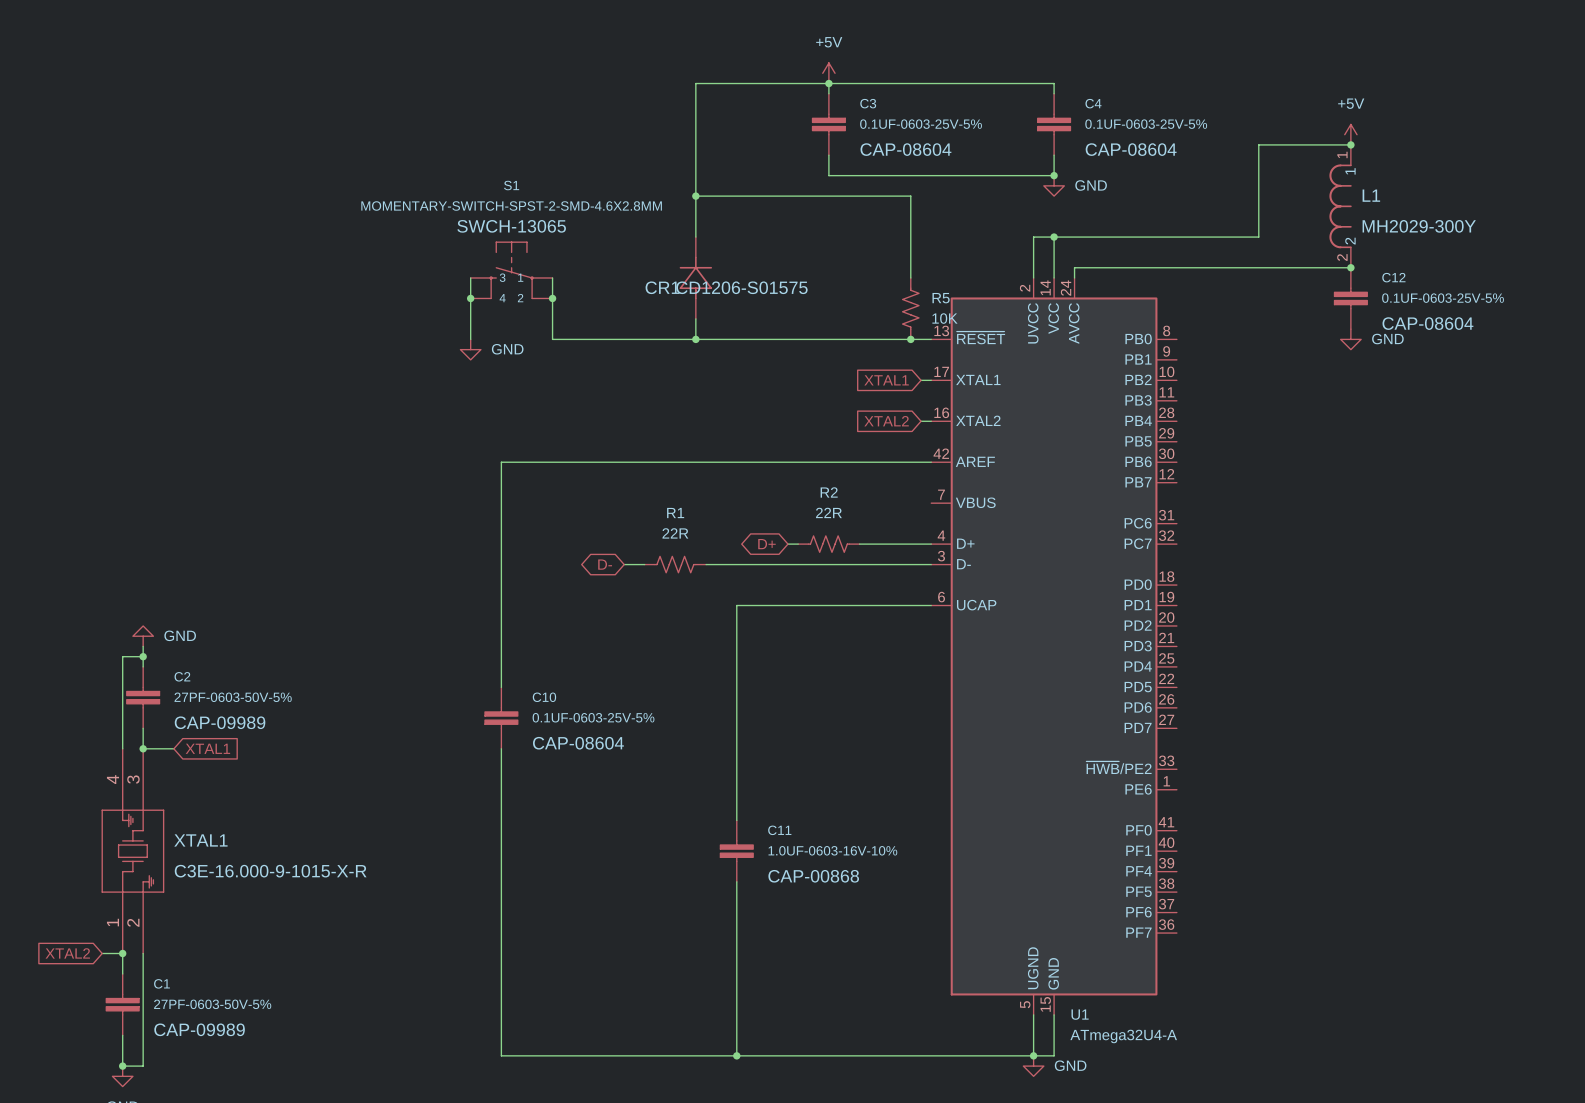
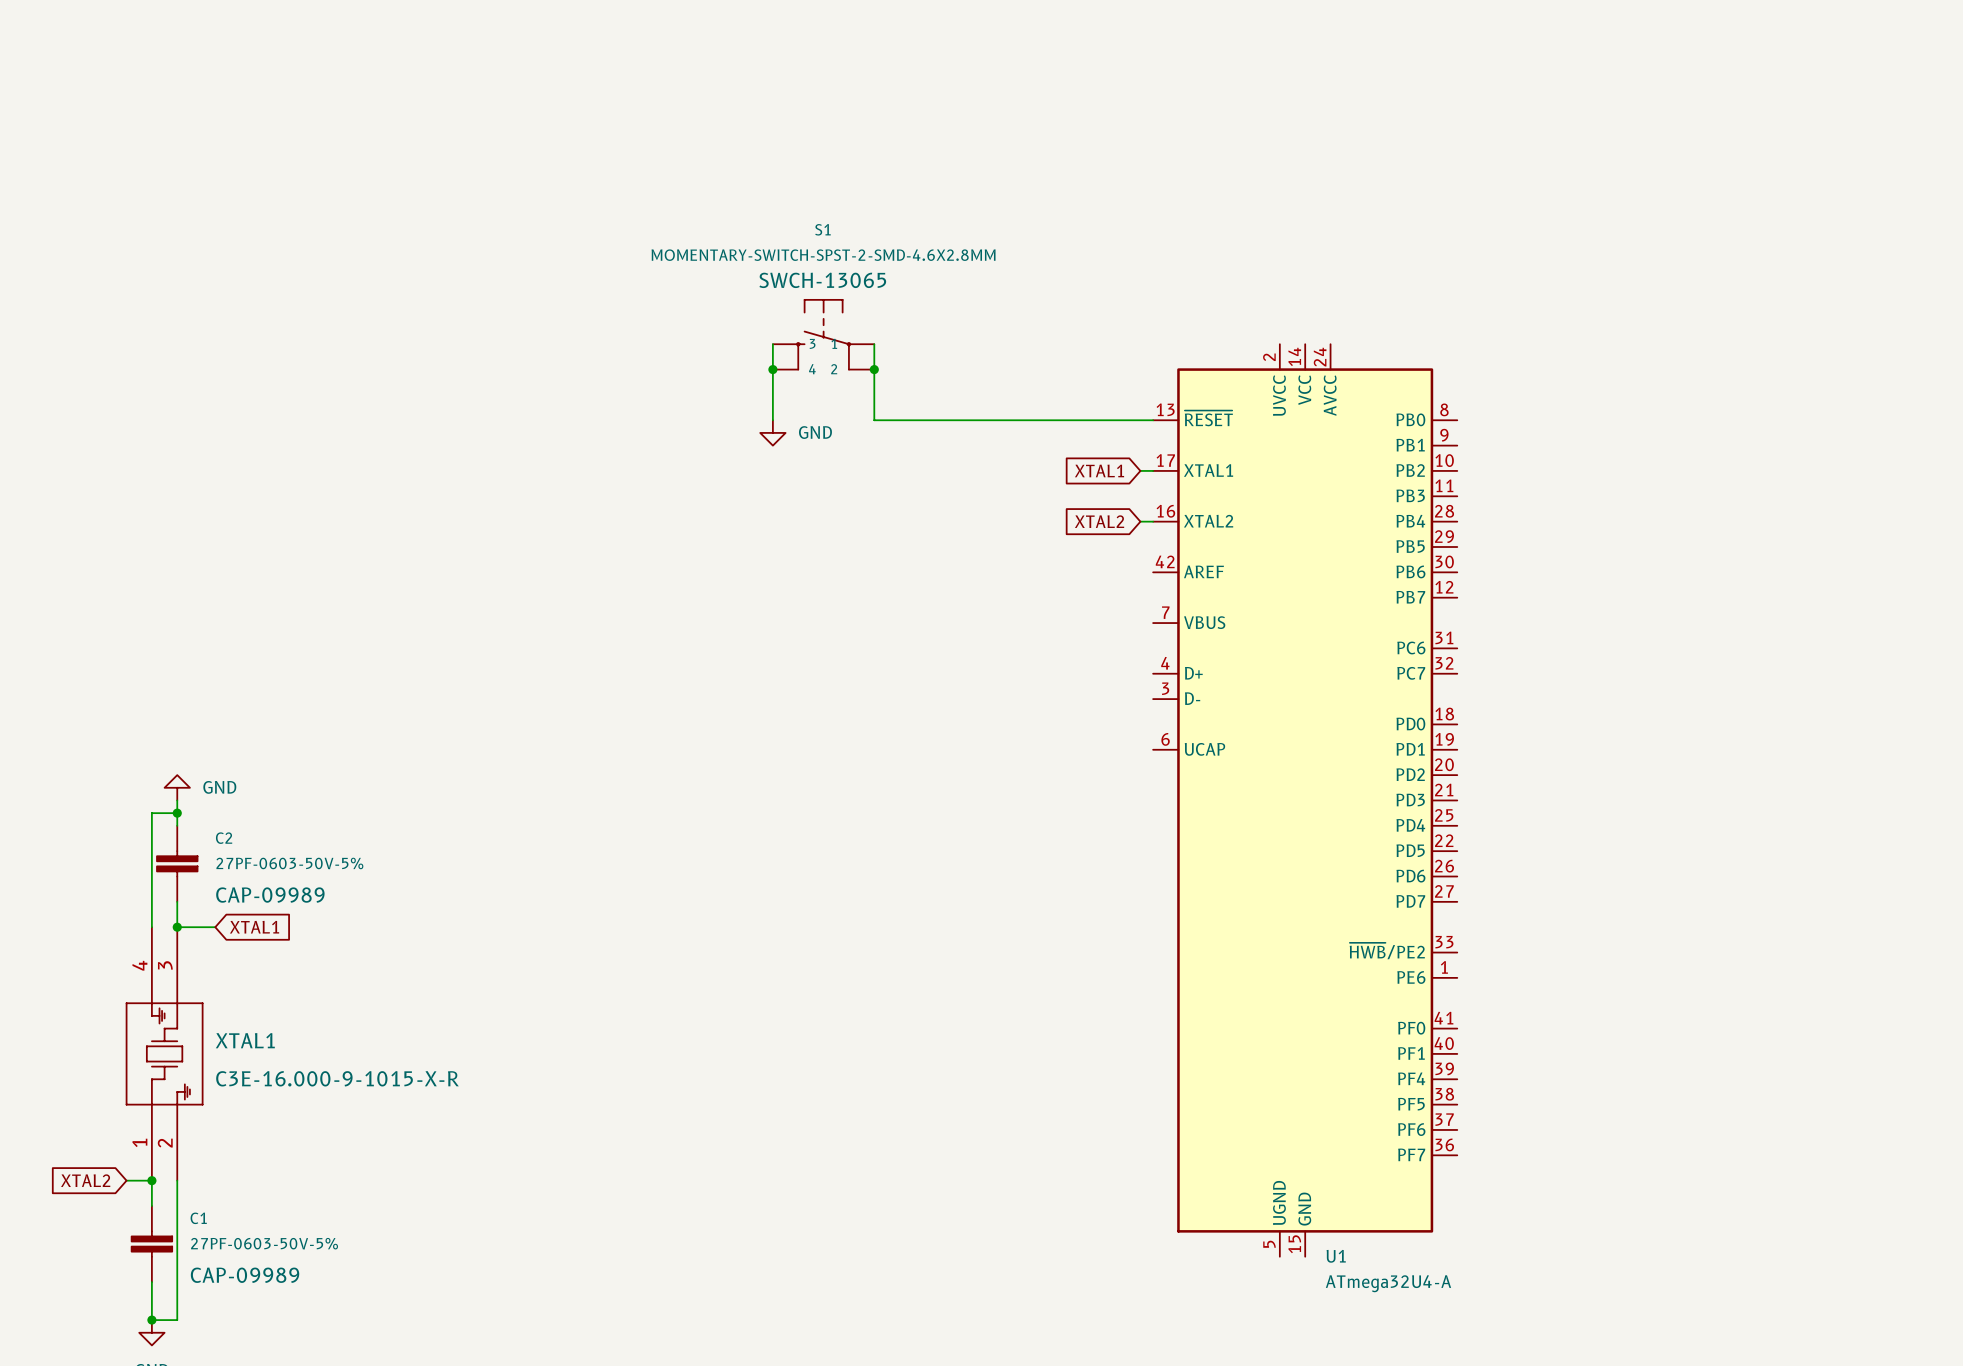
power symbol: +5V (828, 73) -> none
wire: (828, 83) (828, 93) -> none
junction: (828, 83) -> none
wire: (1054, 93) (1054, 83) (695, 83) (695, 237) -> none
C3: 0.1UF-0603-25V-5% (828, 124) -> none
C4: 0.1UF-0603-25V-5% (1054, 124) -> none
power symbol: +5V (1350, 134) -> none
wire: (1350, 144) (1258, 144) (1258, 237) (1033, 237) (1033, 277) -> none
junction: (1350, 144) -> none
wire: (828, 155) (828, 175) (1054, 175) (1054, 155) -> none
junction: (1054, 175) -> none
power symbol: GND (1054, 185) -> none
wire: (695, 196) (910, 196) (910, 277) -> none
junction: (695, 196) -> none
L1: MH2029-300Y (1340, 206) -> none
wire: (1054, 237) (1054, 277) -> none
junction: (1054, 237) -> none
wire: (1350, 267) (1074, 267) (1074, 277) -> none
junction: (1350, 267) -> none
S1 position: (511, 270) -> (823, 334)
wire: (470, 277) (470, 339) -> (772, 344) (772, 420)
wire: (552, 277) (552, 339) (706, 339) -> (874, 344) (874, 420)
CR1: CD1206-S01575 (695, 277) -> none
junction: (470, 298) -> none
junction: (552, 298) -> none
junction: none -> (772, 369)
junction: none -> (874, 369)
C12: 0.1UF-0603-25V-5% (1350, 298) -> none
R5: 10K (910, 308) -> none
wire: (695, 318) (695, 339) -> none
junction: (695, 339) -> none
junction: (910, 339) -> none
power symbol: GND (1350, 339) -> none
power symbol position: GND (470, 349) -> GND (772, 432)
wire: (931, 462) (501, 462) (501, 687) -> none
global label: D+ (766, 544) -> none
wire: (787, 544) (798, 544) -> none
R2: 22R (828, 544) -> none
wire: (859, 544) (931, 544) -> none
global label: D- (605, 564) -> none
wire: (624, 564) (644, 564) -> none
R1: 22R (675, 564) -> none
wire: (706, 564) (931, 564) -> none
wire: (931, 605) (736, 605) (736, 820) -> none
C10: 0.1UF-0603-25V-5% (501, 718) -> none
wire: (501, 748) (501, 1055) (1054, 1055) (1054, 1014) -> none
C11: 1.0UF-0603-16V-10% (736, 851) -> none
wire: (736, 881) (736, 1055) -> none
wire: (1033, 1014) (1033, 1055) -> none
junction: (736, 1055) -> none
junction: (1033, 1055) -> none
power symbol: GND (1033, 1066) -> none

